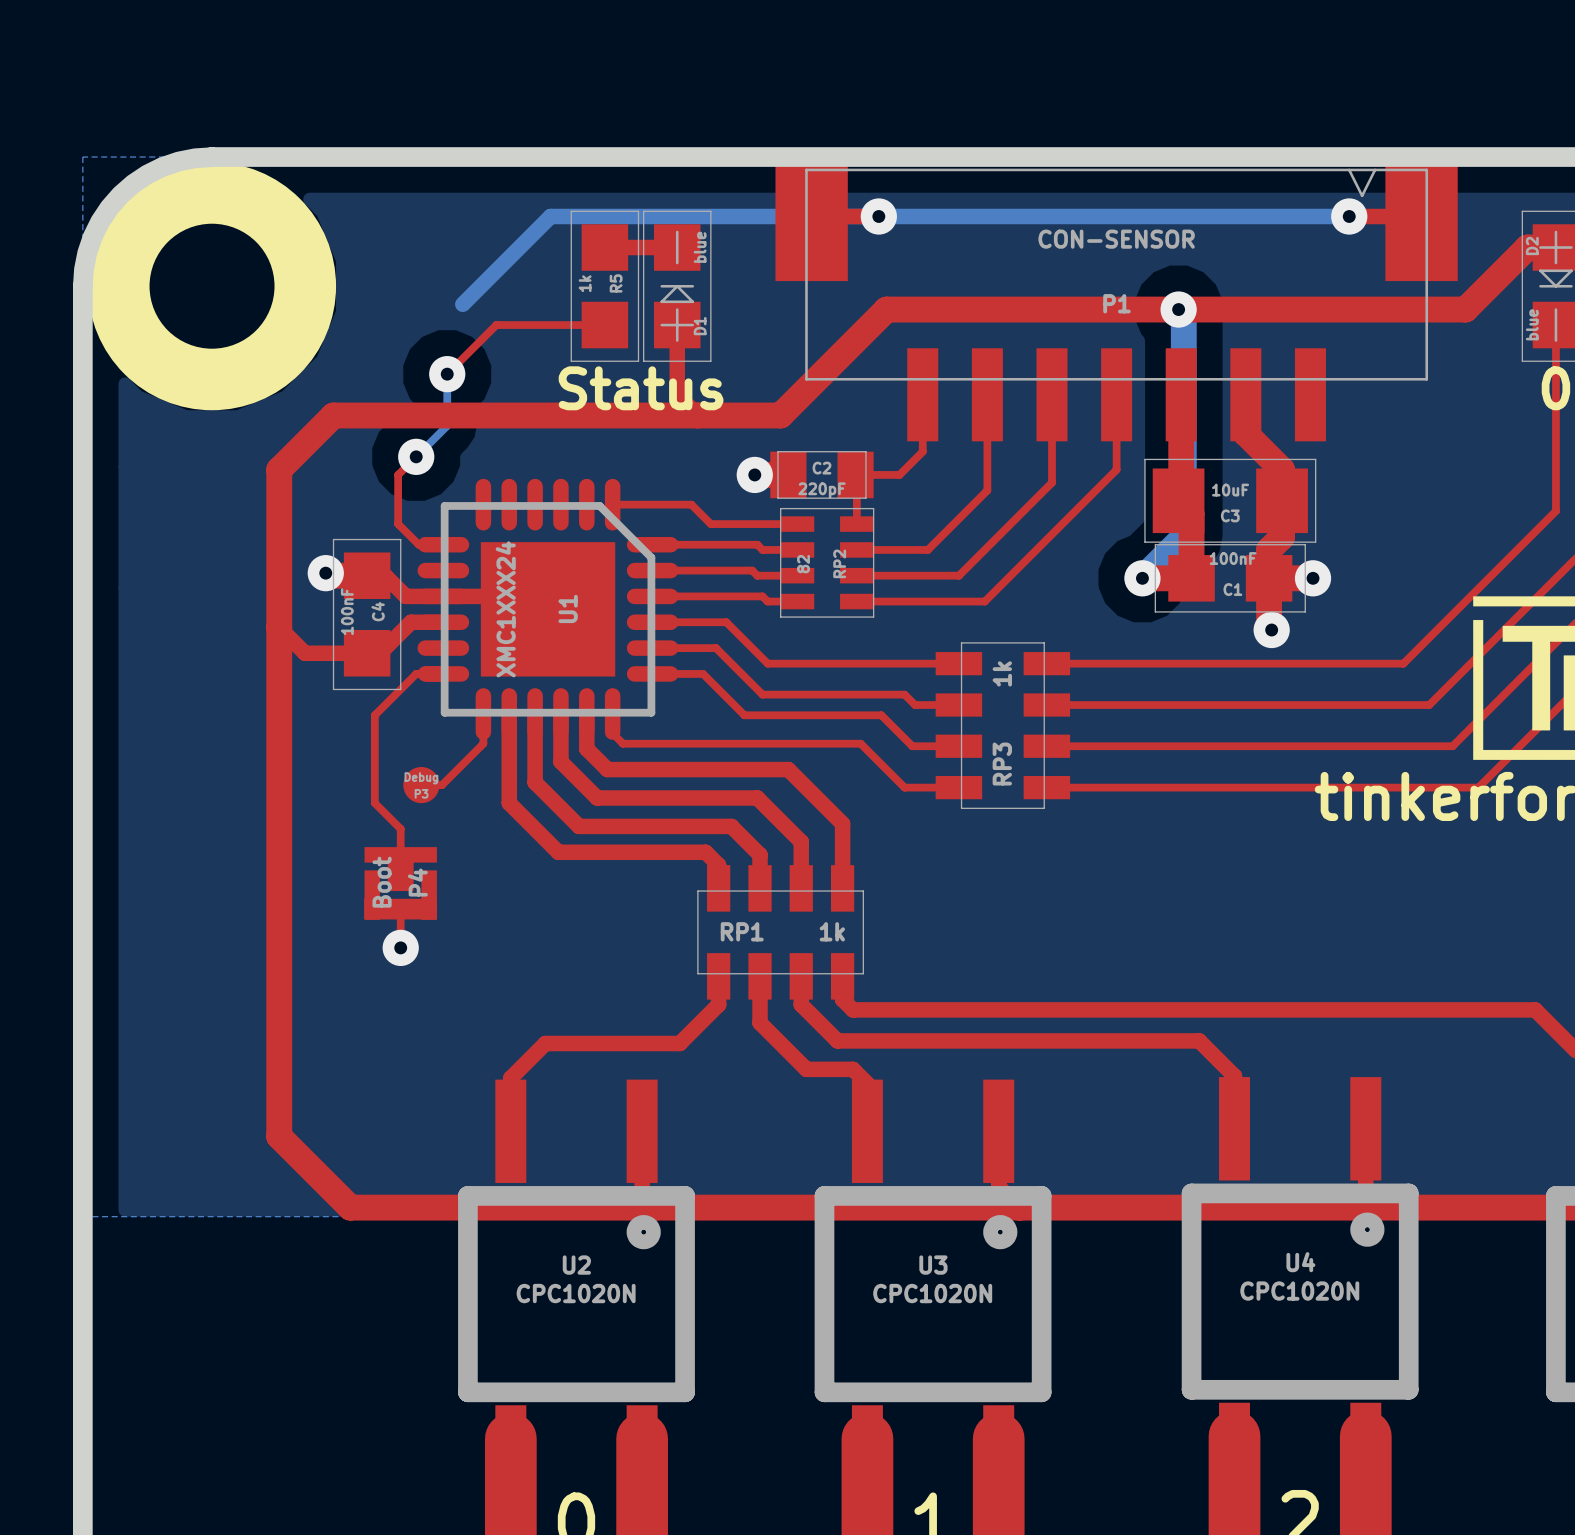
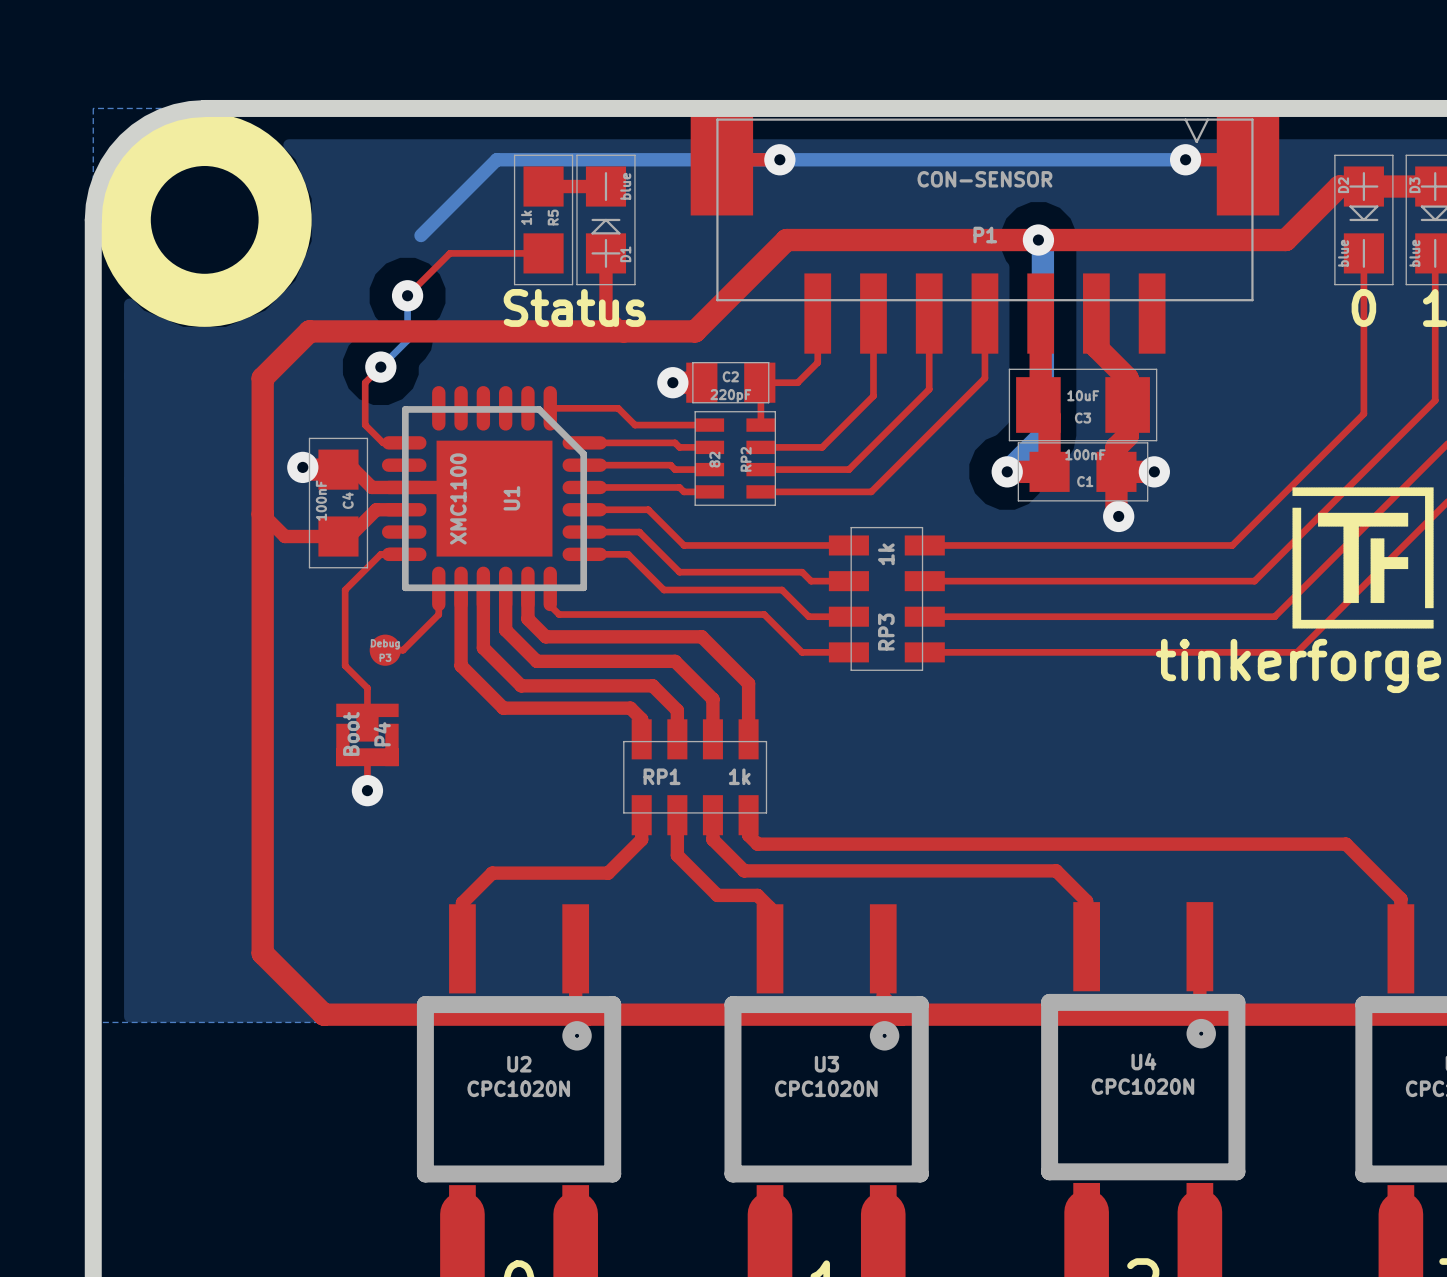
U1 value: XMC1XXX24 (505, 609) -> XMC1100 (458, 498)

